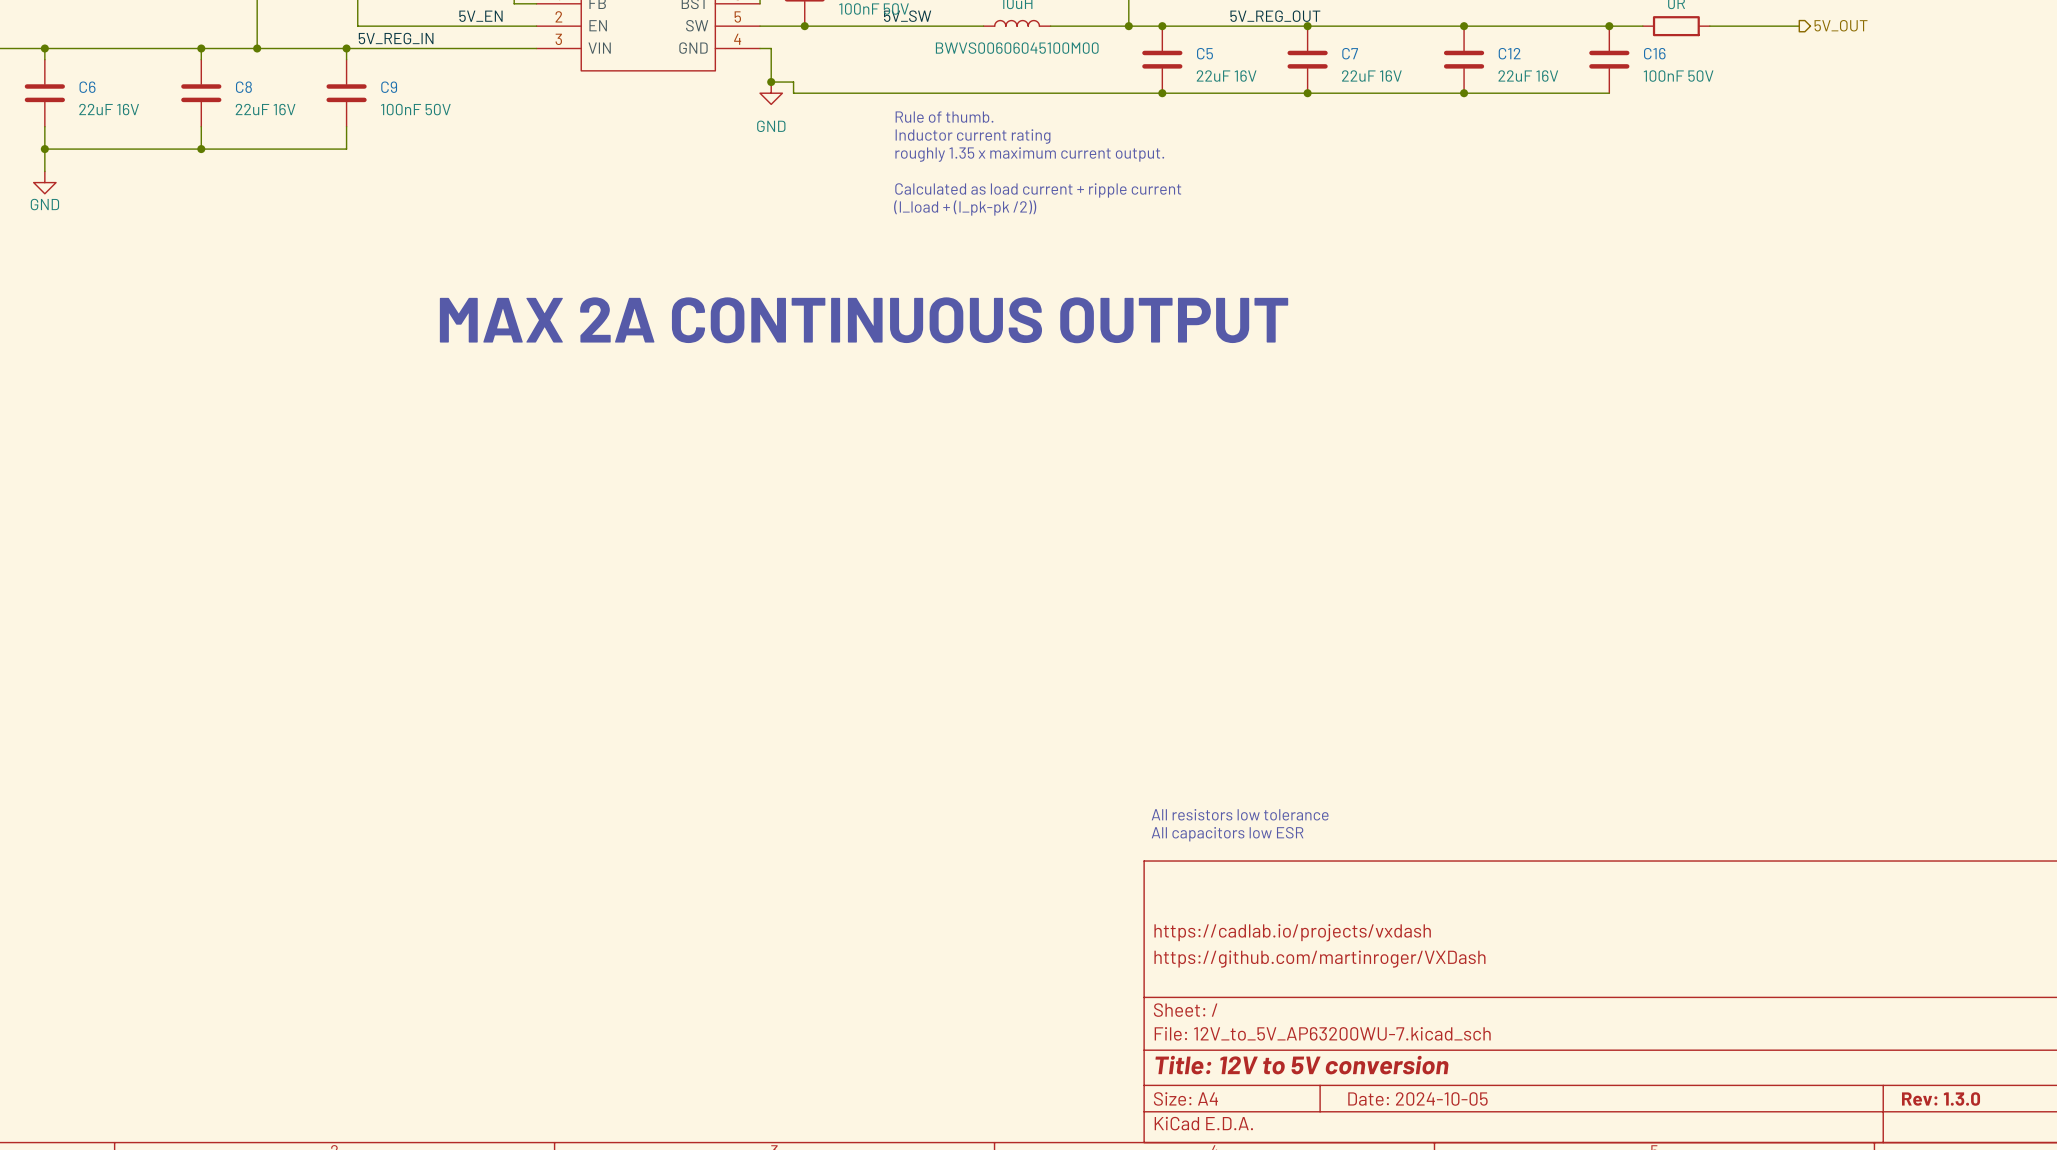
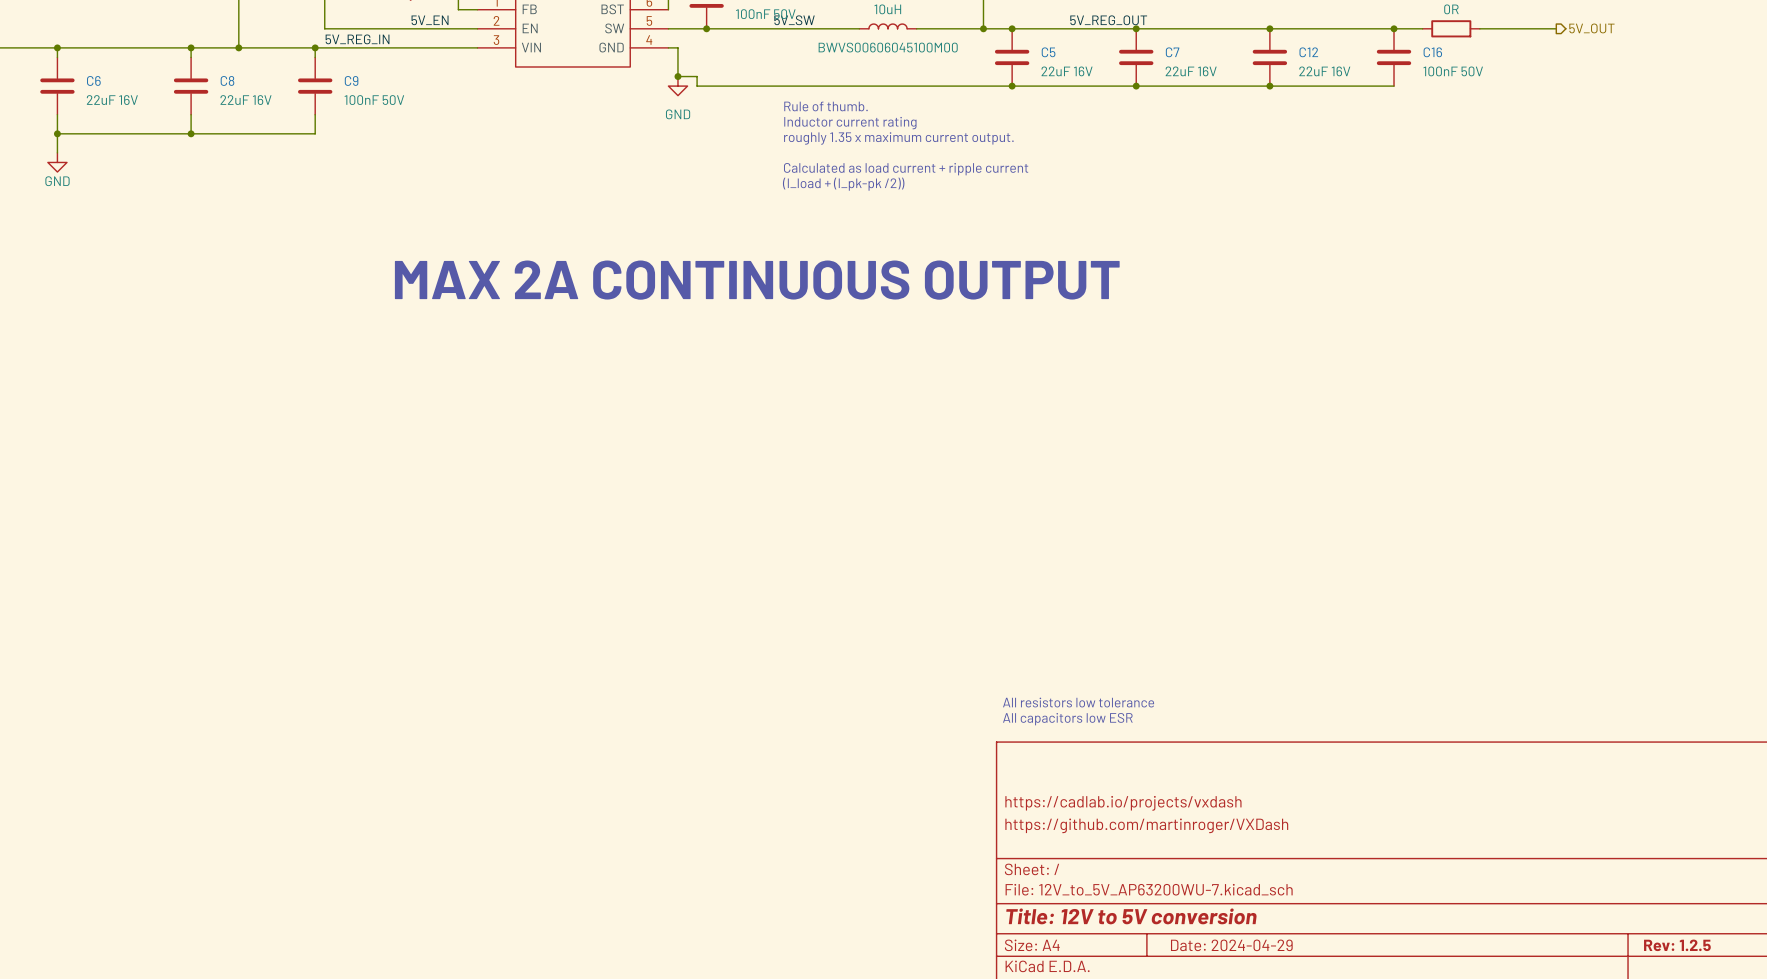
title block: Date: 2024-10-05 (1417, 1098) -> Date: 2024-04-29 (1231, 945)
title block: Rev: 1.3.0 (1941, 1099) -> Rev: 1.2.5 (1677, 945)

